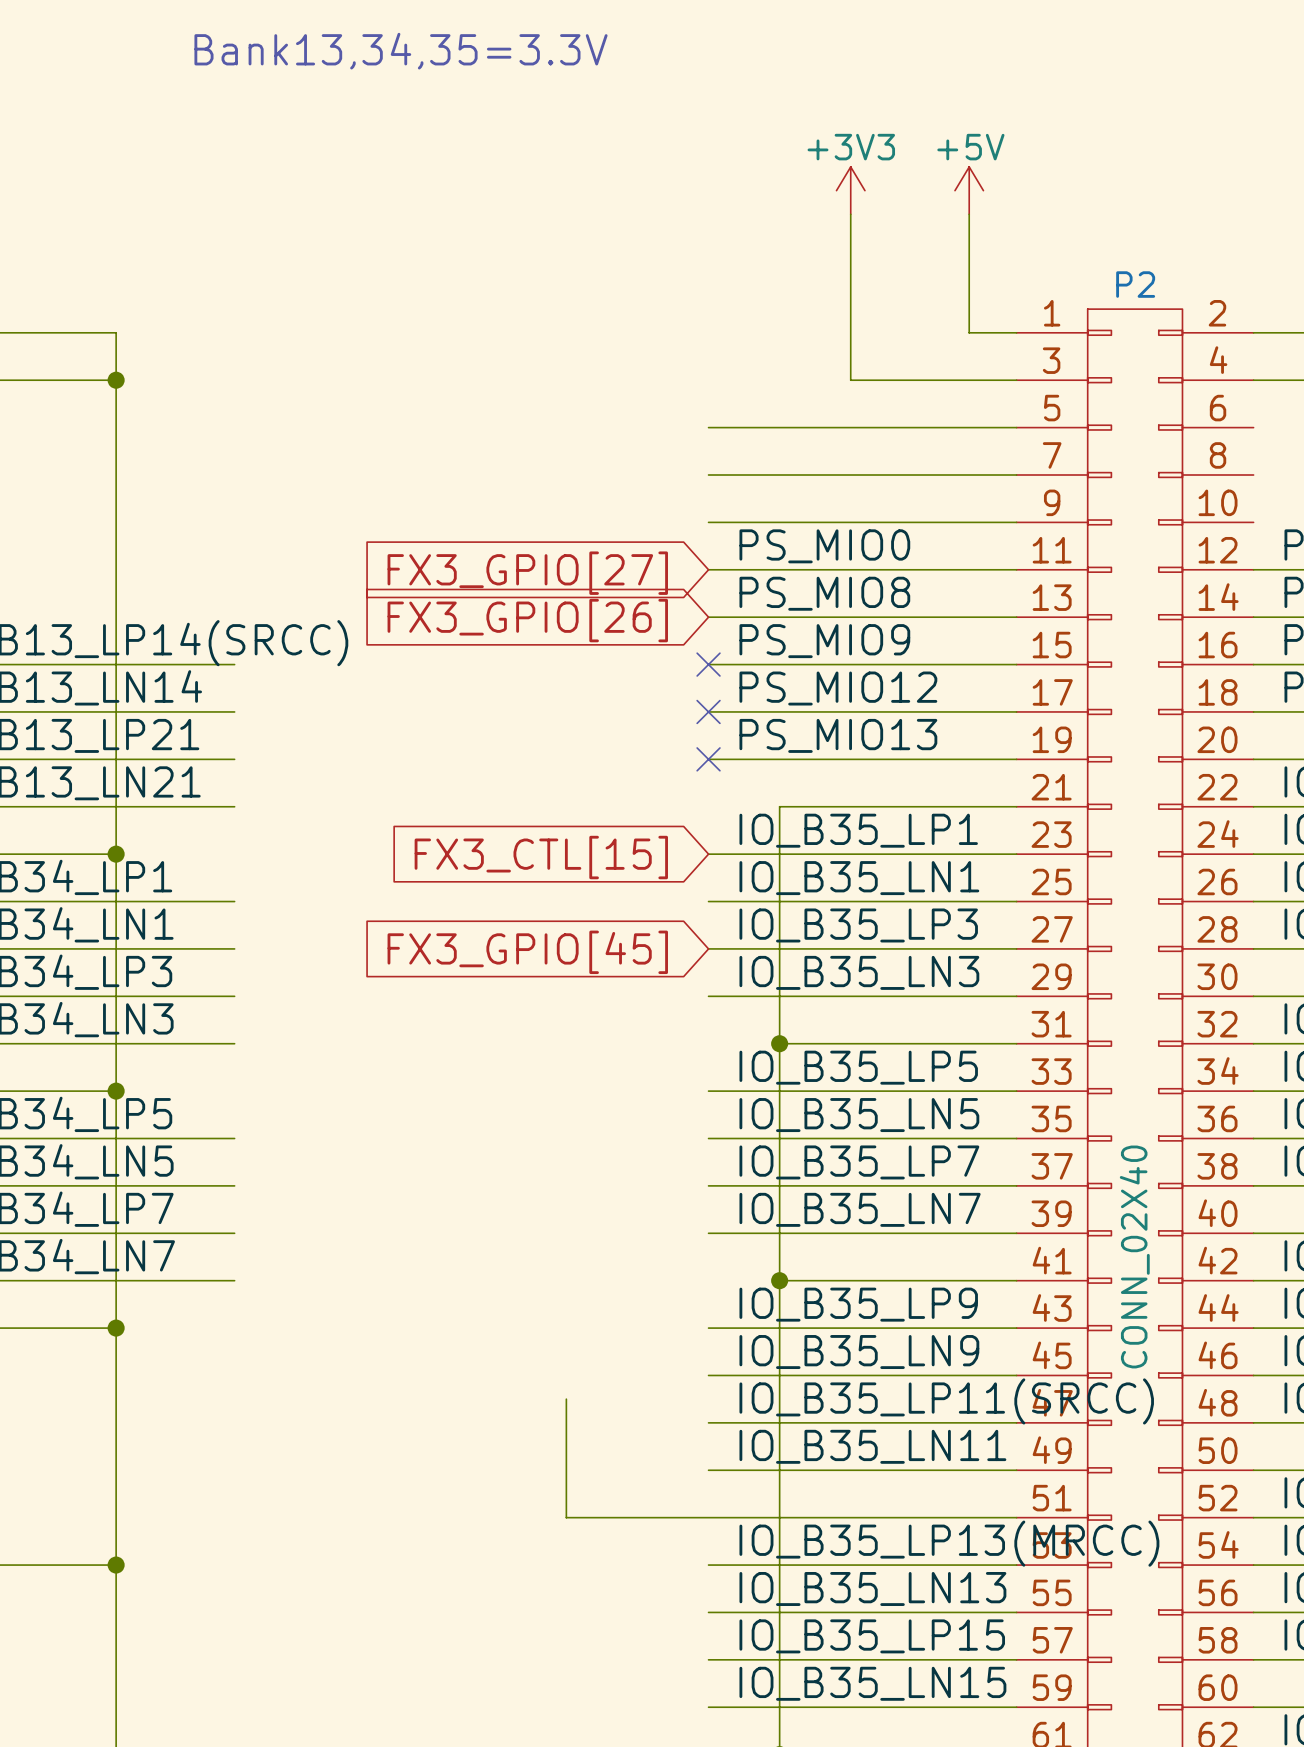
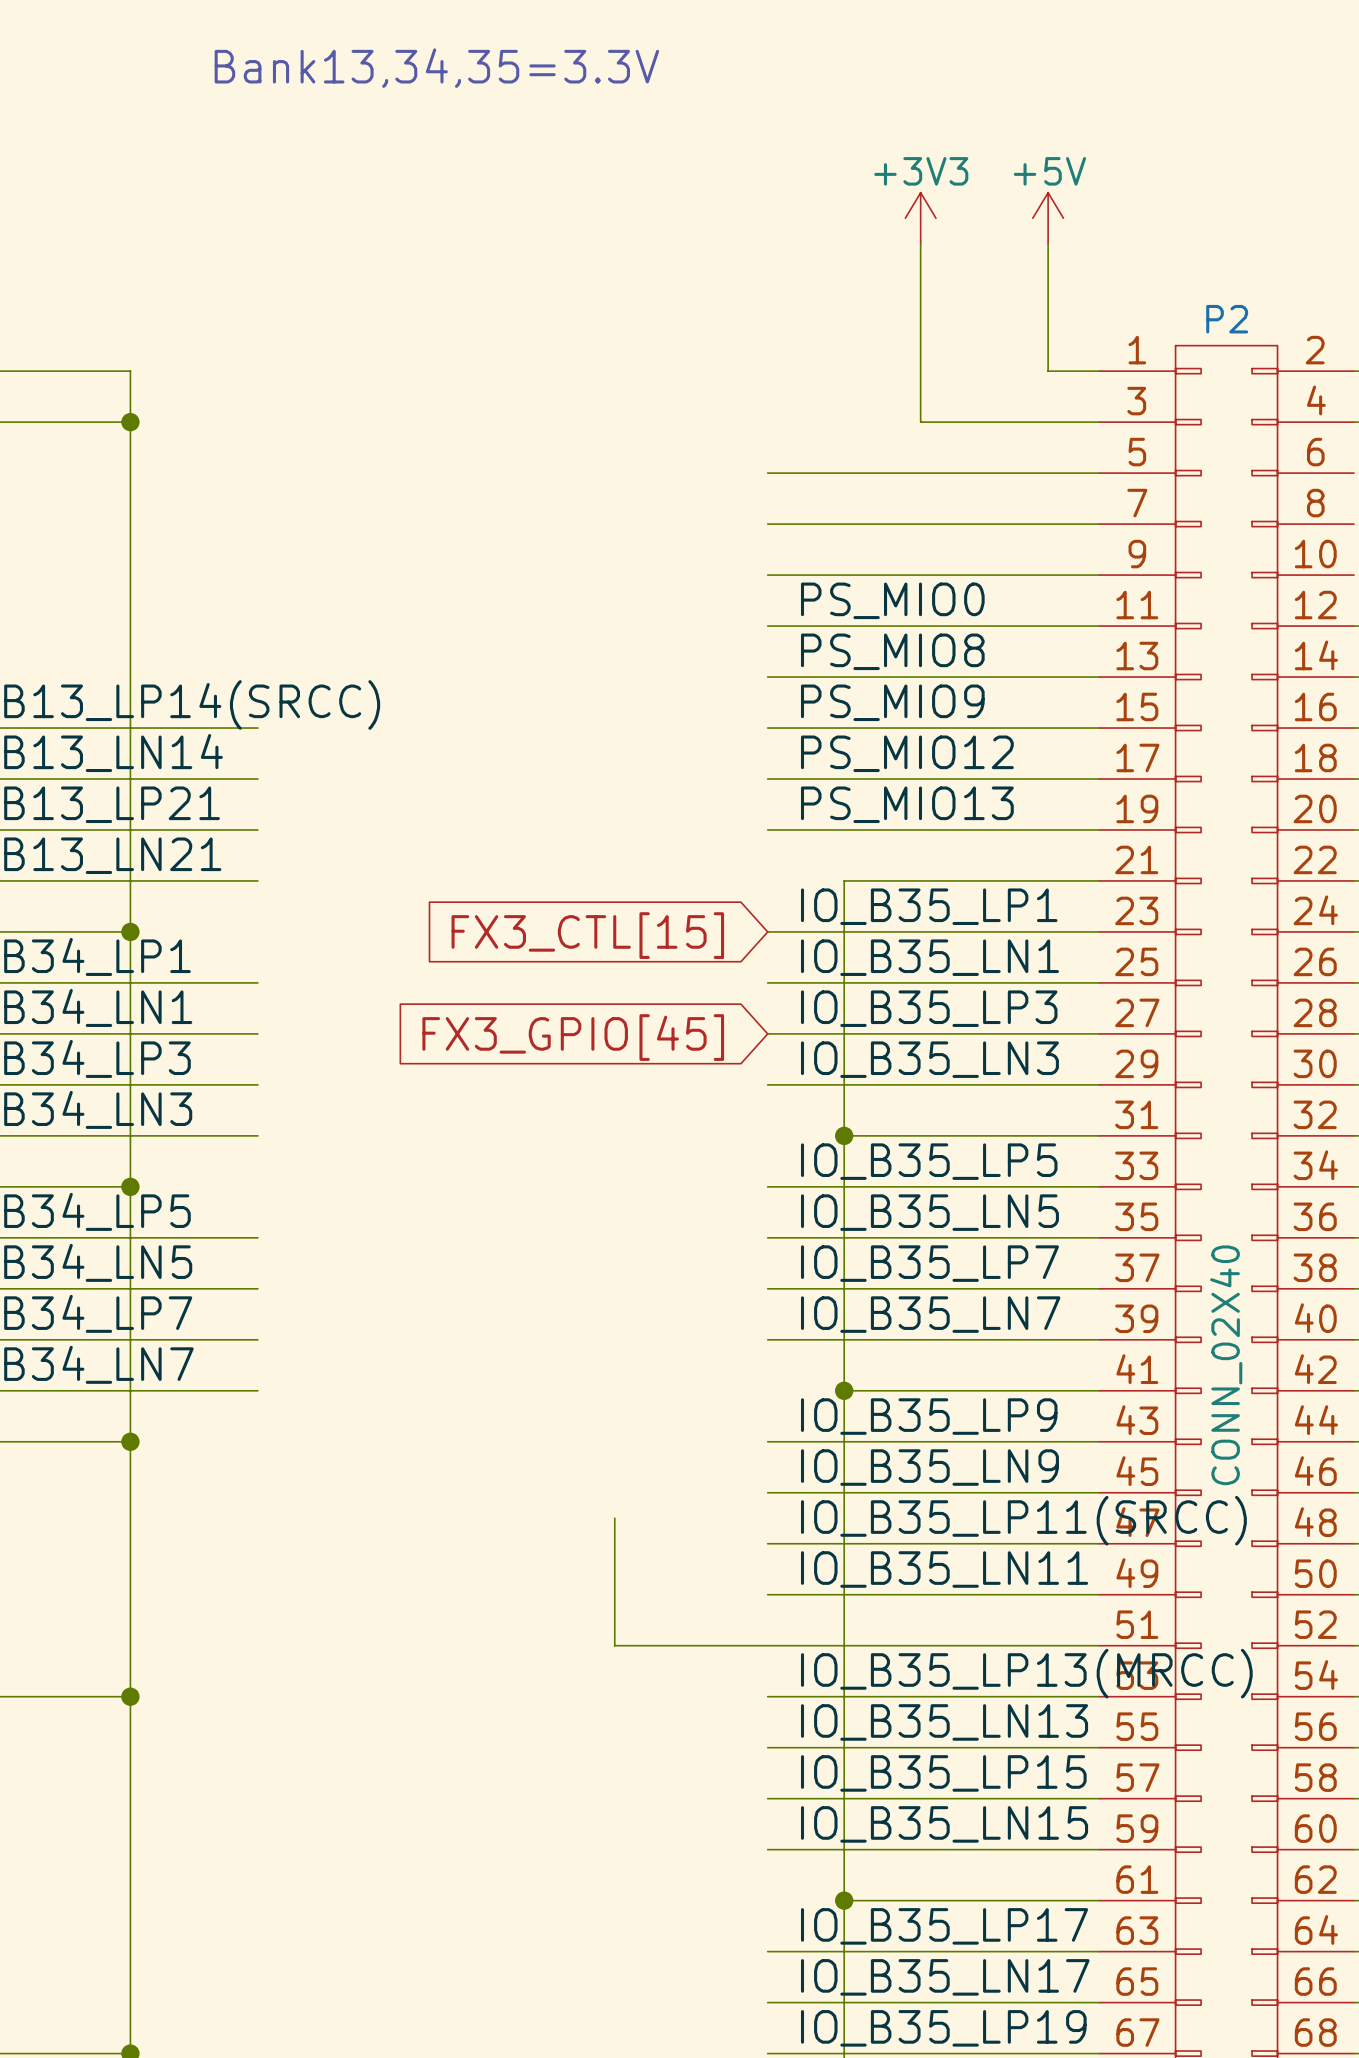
global label: FX3_GPIO[27] (527, 573) -> none
global label: FX3_GPIO[26] (527, 620) -> none
no-connect mark: (708, 664) -> none
no-connect mark: (708, 711) -> none
no-connect mark: (708, 759) -> none

